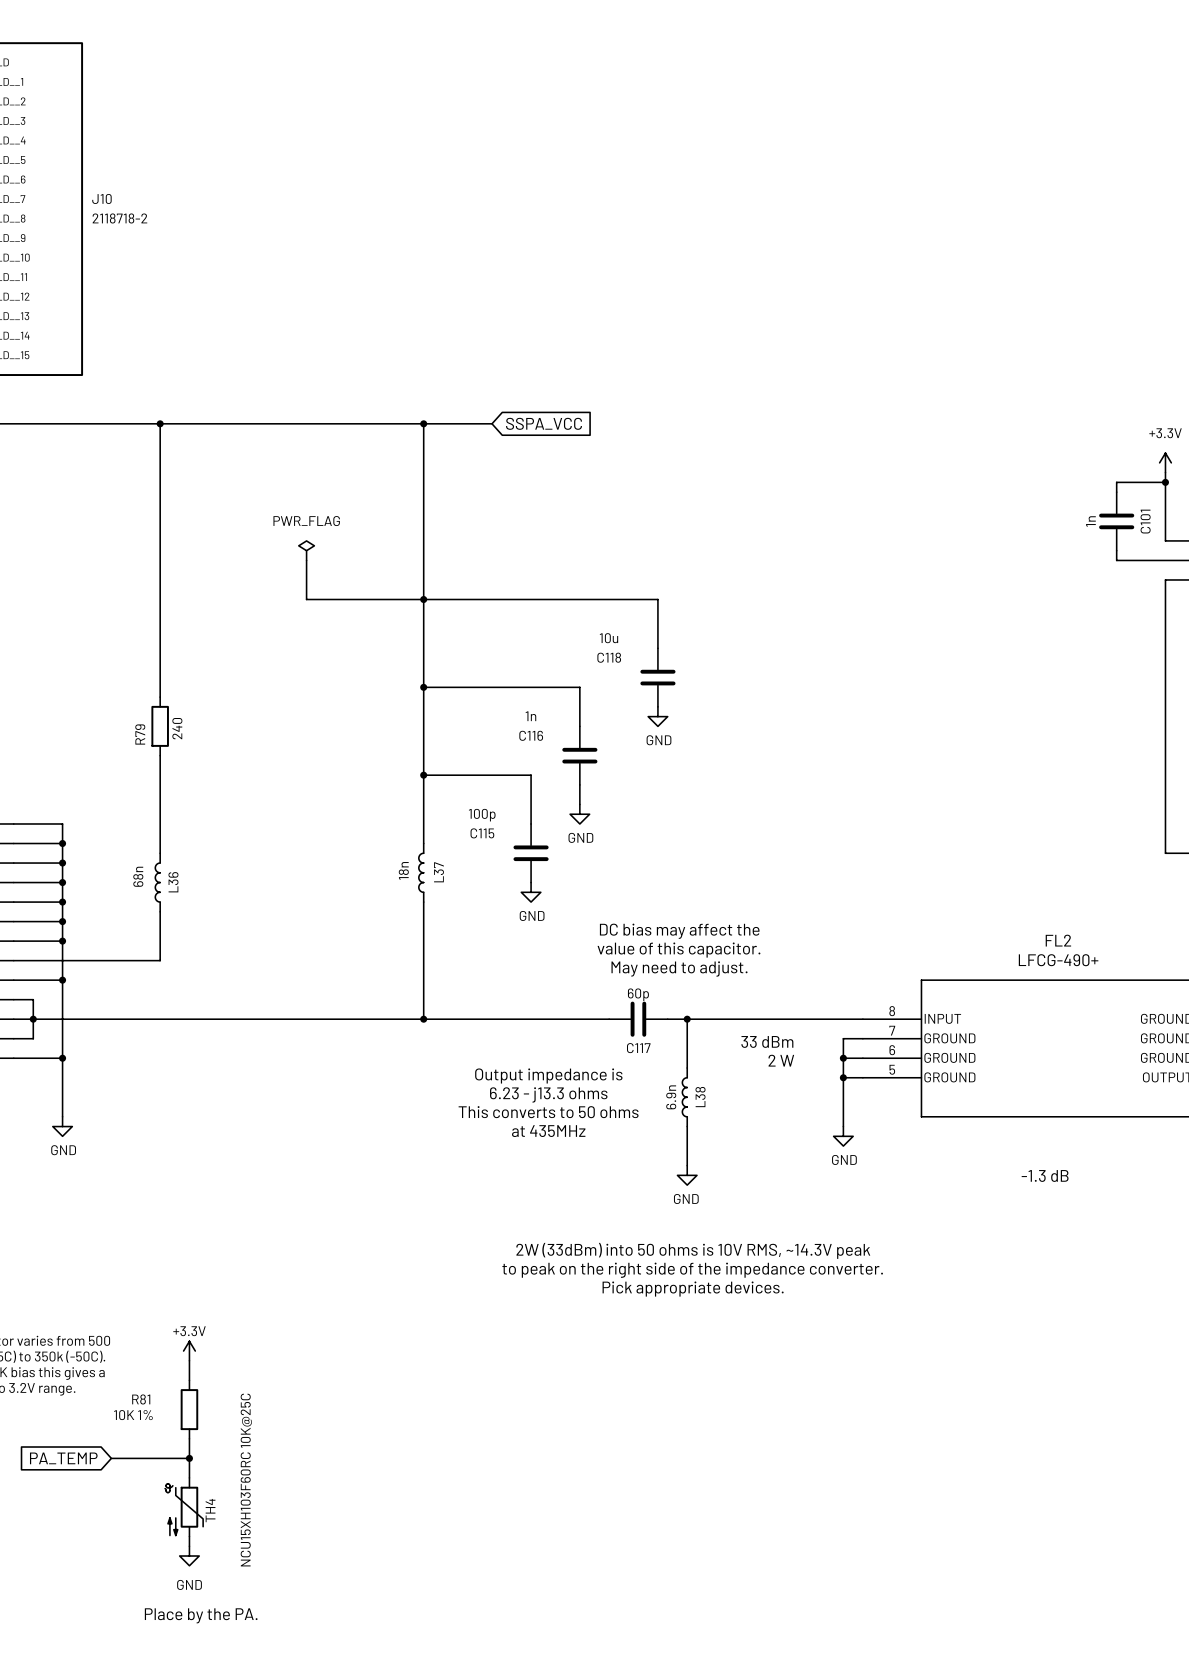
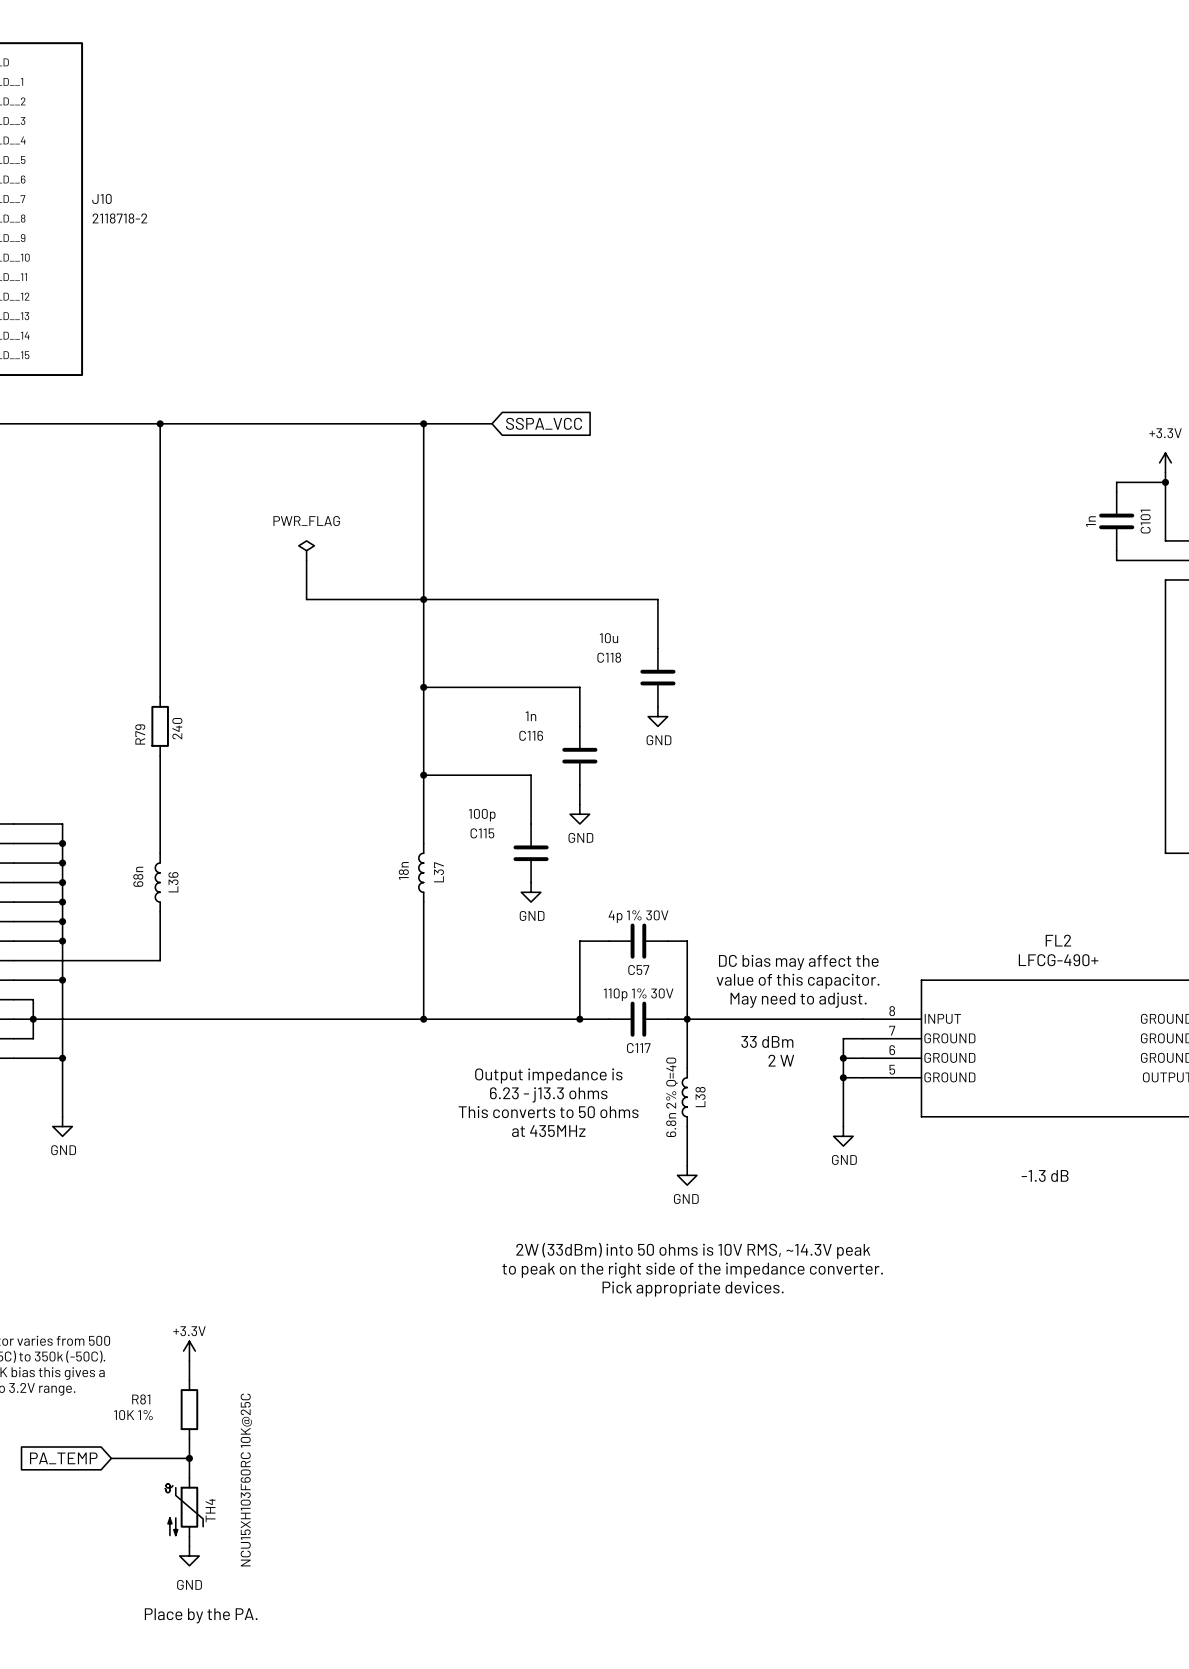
text position: DC bias may affect the (679, 931) -> DC bias may affect the (798, 962)
wire: none -> (609, 941) (579, 941) (579, 1019)
C57: none -> 4p 1% 30V (638, 941)
wire: none -> (667, 941) (687, 941) (687, 1019)
text position: value of this capacitor. (678, 950) -> value of this capacitor. (798, 981)
text position: May need to adjust. (679, 969) -> May need to adjust. (798, 1000)
C117 value: 60p (638, 994) -> 110p 1% 30V (638, 994)
junction: none -> (579, 1019)
L38 value: 6.9n (671, 1097) -> 6.8n 2% Q=40 (671, 1097)

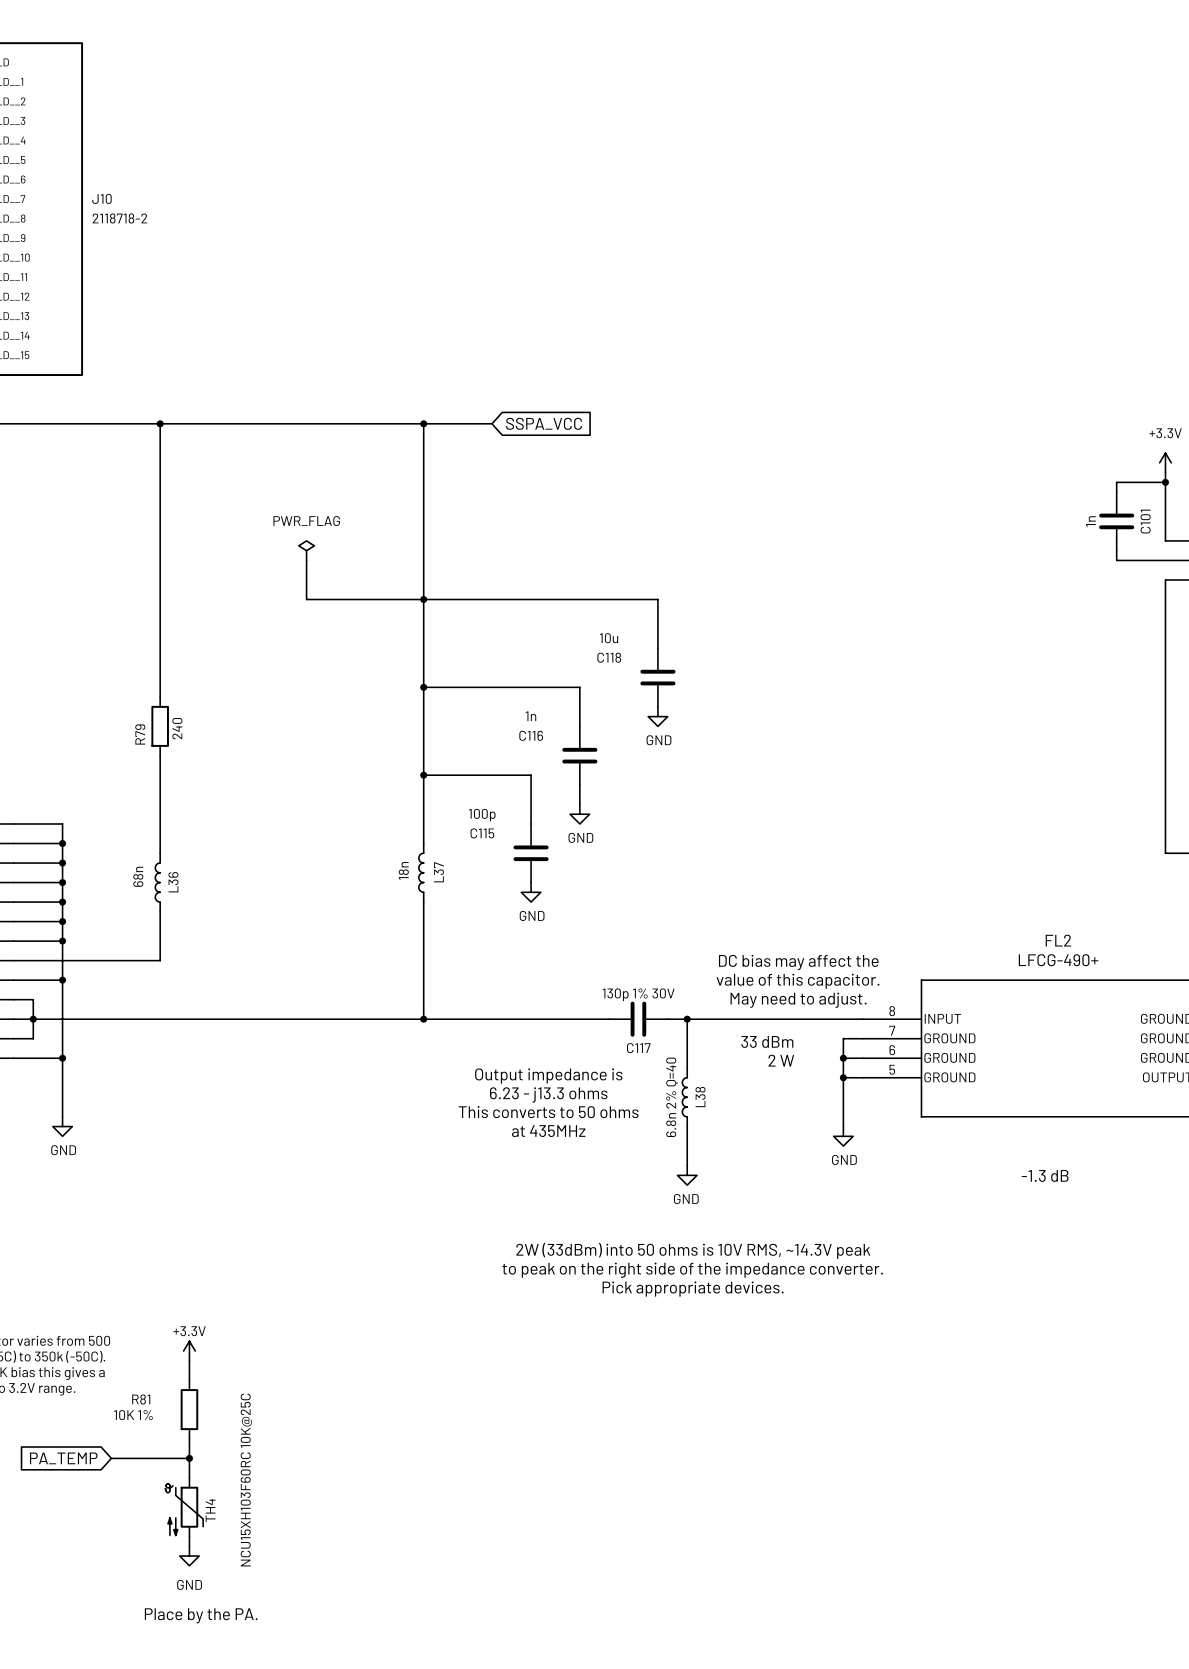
wire: (609, 941) (579, 941) (579, 1019) -> none
C57: 4p 1% 30V (638, 941) -> none
wire: (667, 941) (687, 941) (687, 1019) -> none
C117 value: 110p 1% 30V (638, 994) -> 130p 1% 30V (638, 994)
junction: (579, 1019) -> none

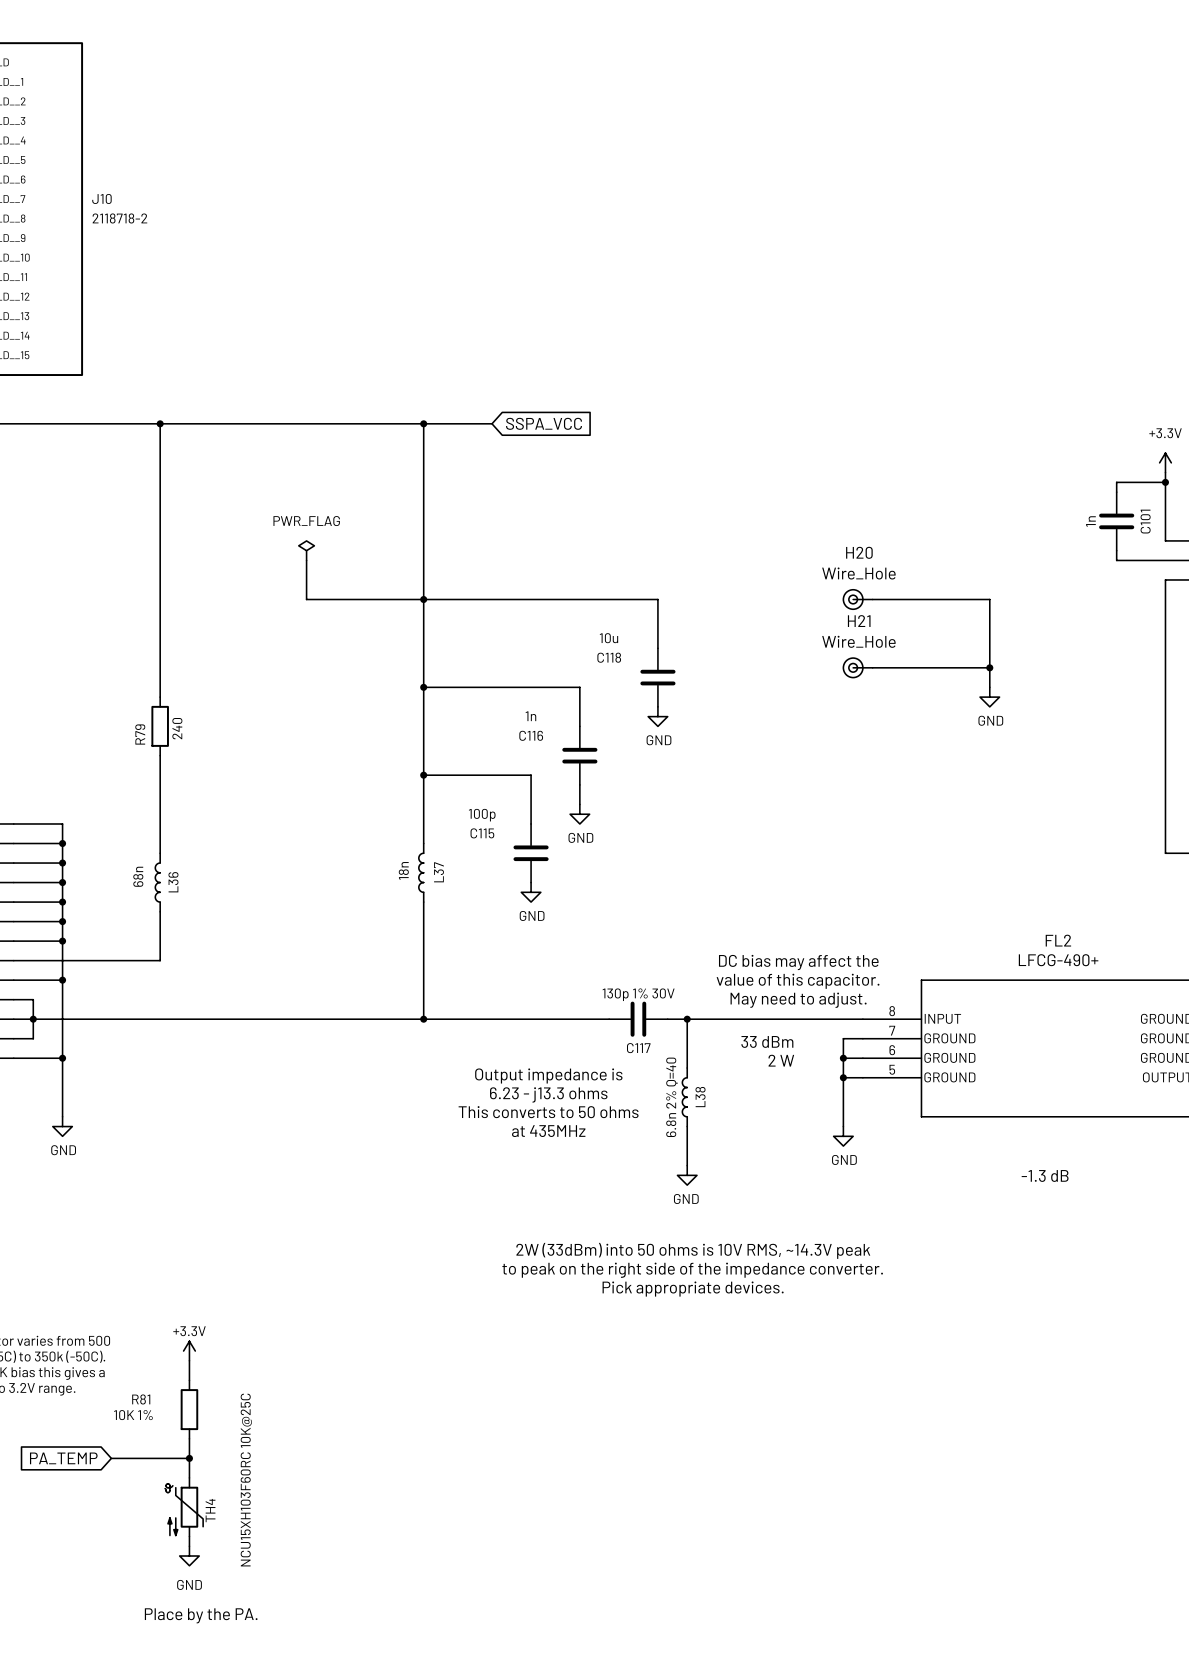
H20: none -> Wire_Hole (858, 599)
wire: none -> (872, 599) (989, 599) (989, 687)
H21: none -> Wire_Hole (858, 667)
wire: none -> (872, 667) (989, 667)
junction: none -> (989, 667)
power symbol: none -> GND (989, 697)

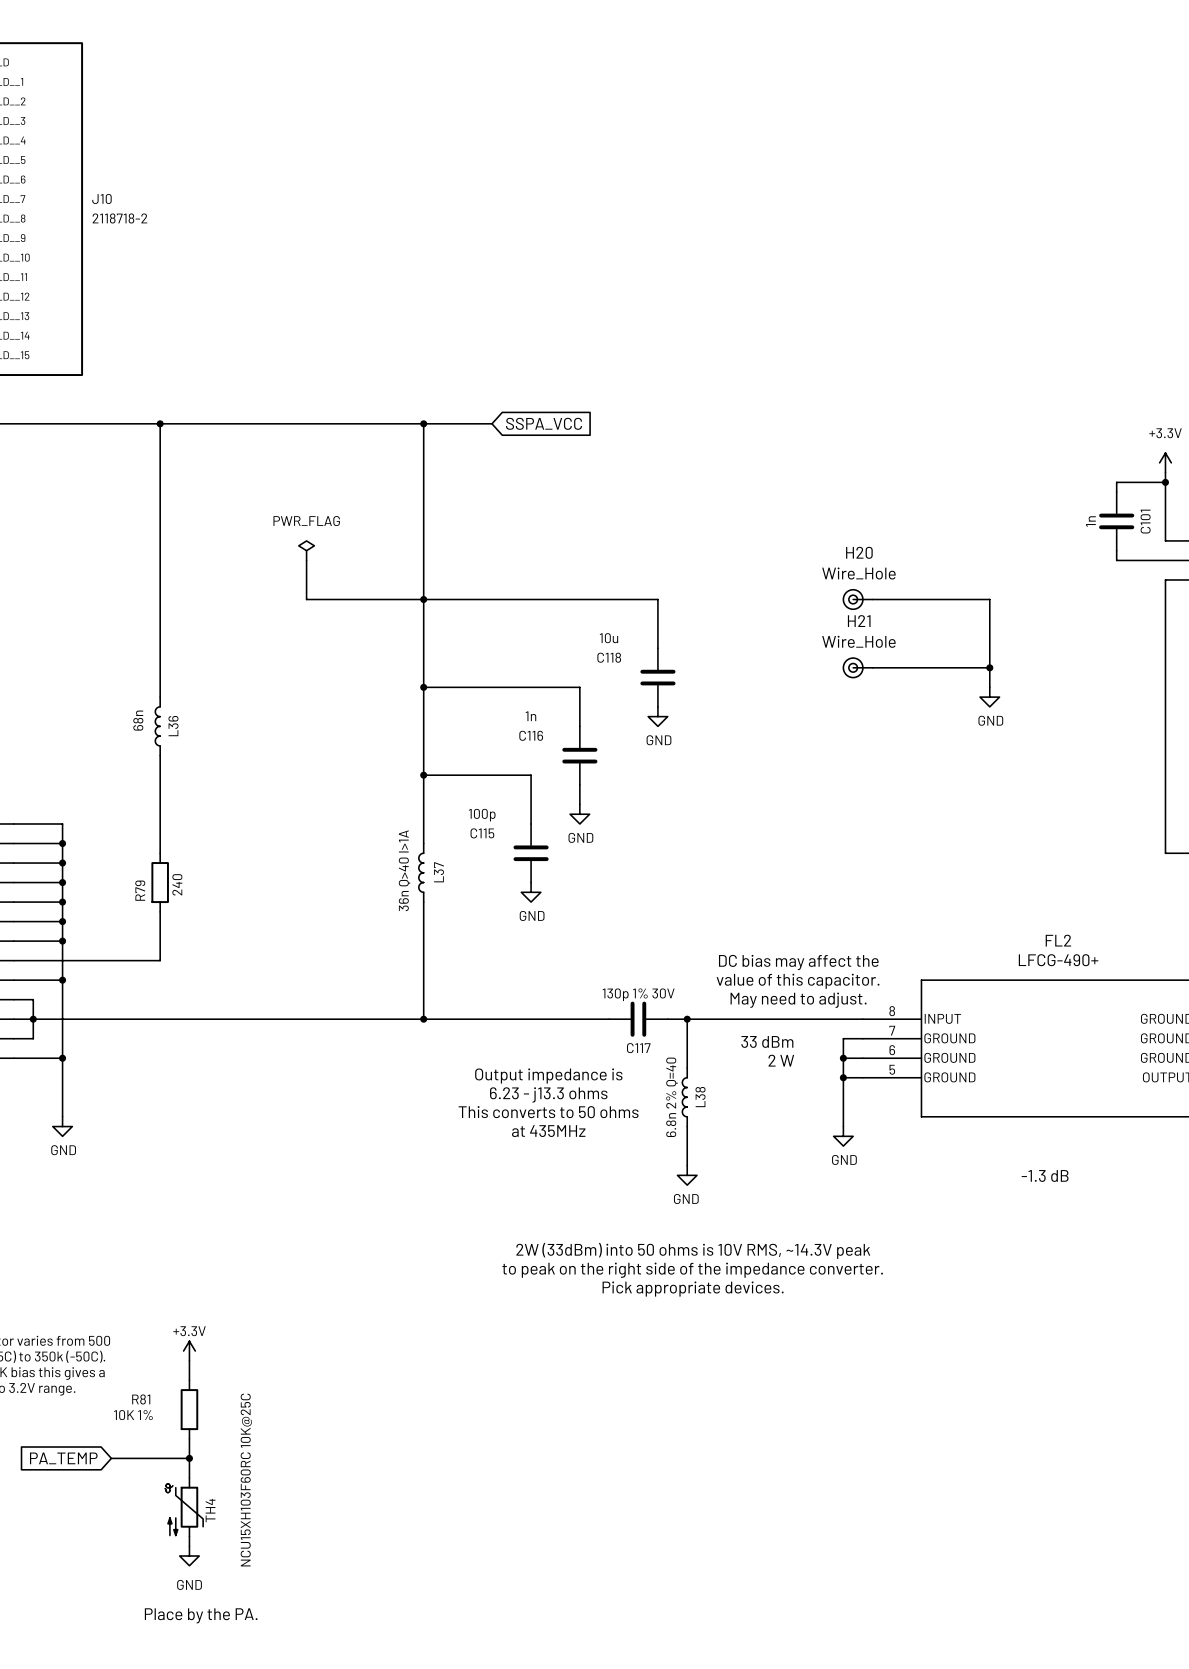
R79 position: (160, 726) -> (160, 882)
L37 value: 18n (403, 870) -> 36n Q>40 I>1A (404, 870)
L36 position: (157, 882) -> (157, 726)

